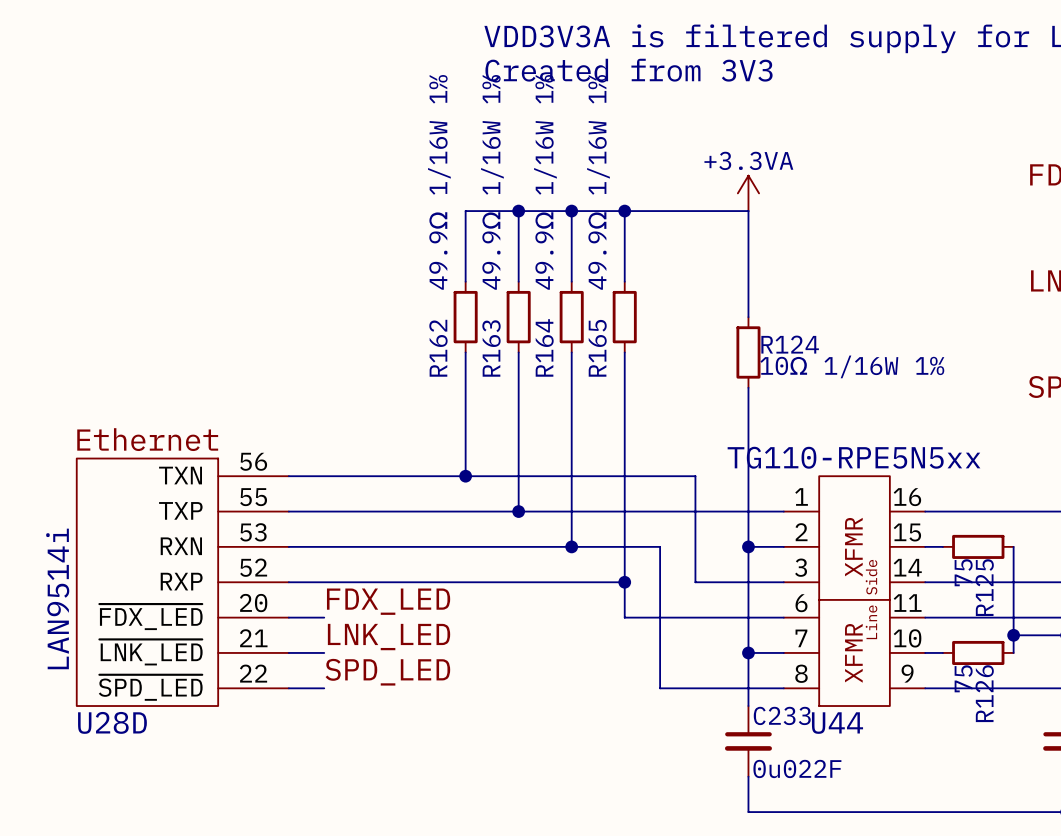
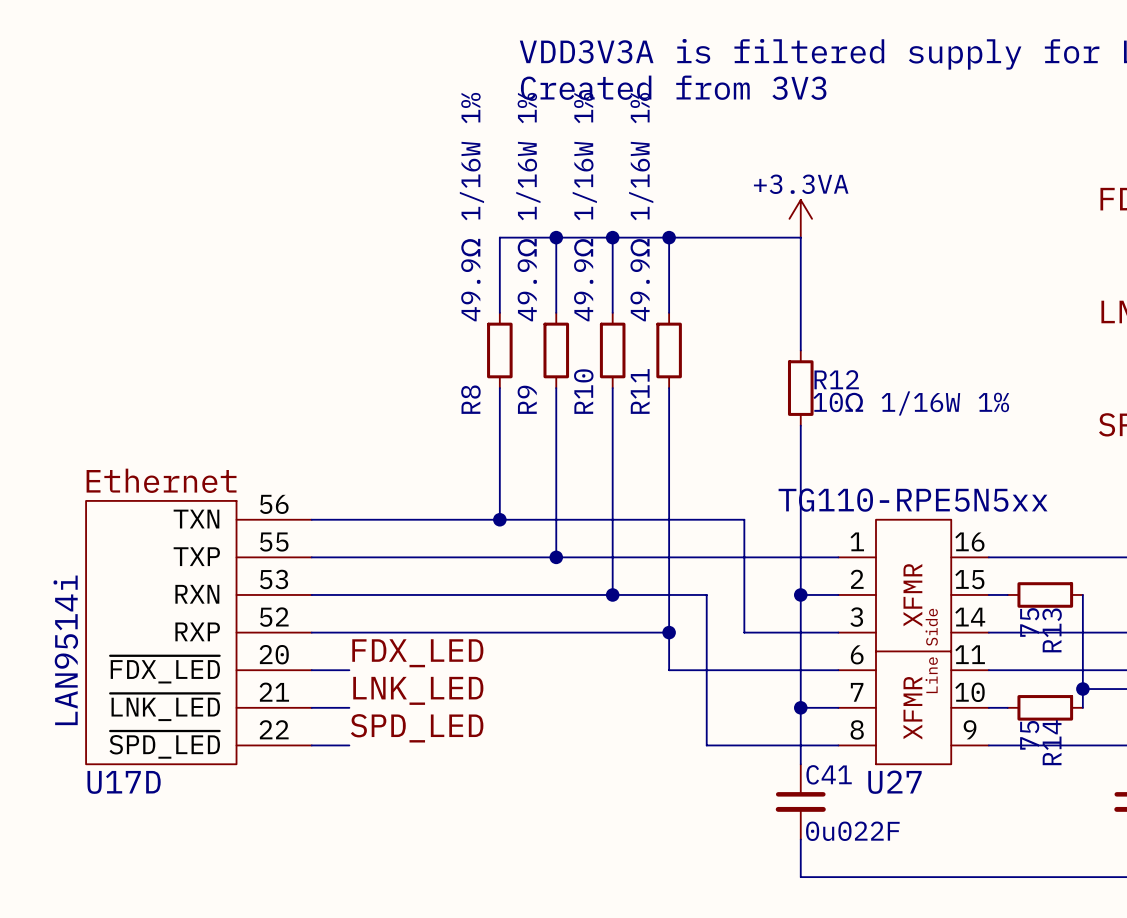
R124 name: R124 (790, 344) -> R12 (836, 379)
R164 name: R164 (544, 347) -> R10 (583, 391)
R162 name: R162 (438, 348) -> R8 (470, 399)
R163 name: R163 (491, 348) -> R9 (527, 399)
R165 name: R165 (597, 348) -> R11 (640, 391)
R125 name: R125 (984, 587) -> R13 (1052, 630)
R126 name: R126 (984, 693) -> R14 (1052, 742)
C233 name: C233 (782, 715) -> C41 (829, 774)
U28D name: U28D (112, 722) -> U17D (124, 782)
U44 name: U44 (837, 723) -> U27 (894, 782)

